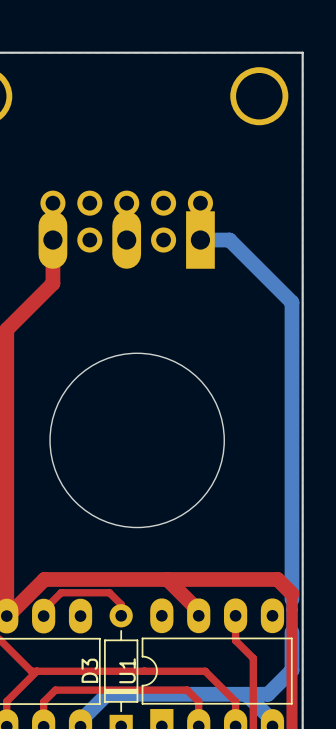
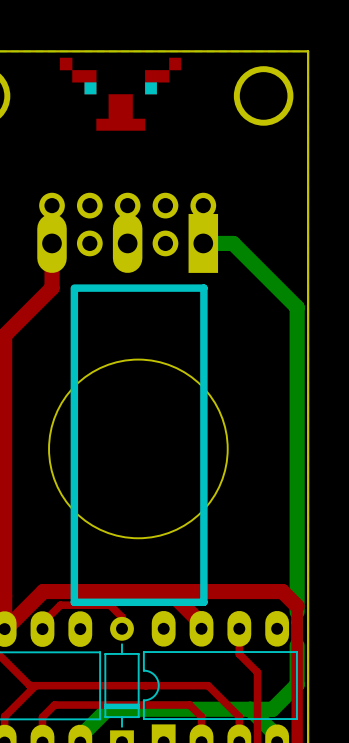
drawing: none -> [59, 57, 182, 131]
line: none -> (74, 288) (203, 288) (203, 602) (74, 602) (74, 289)
D3 name: D3 (89, 670) -> none
U1 name: U1 (127, 670) -> none

